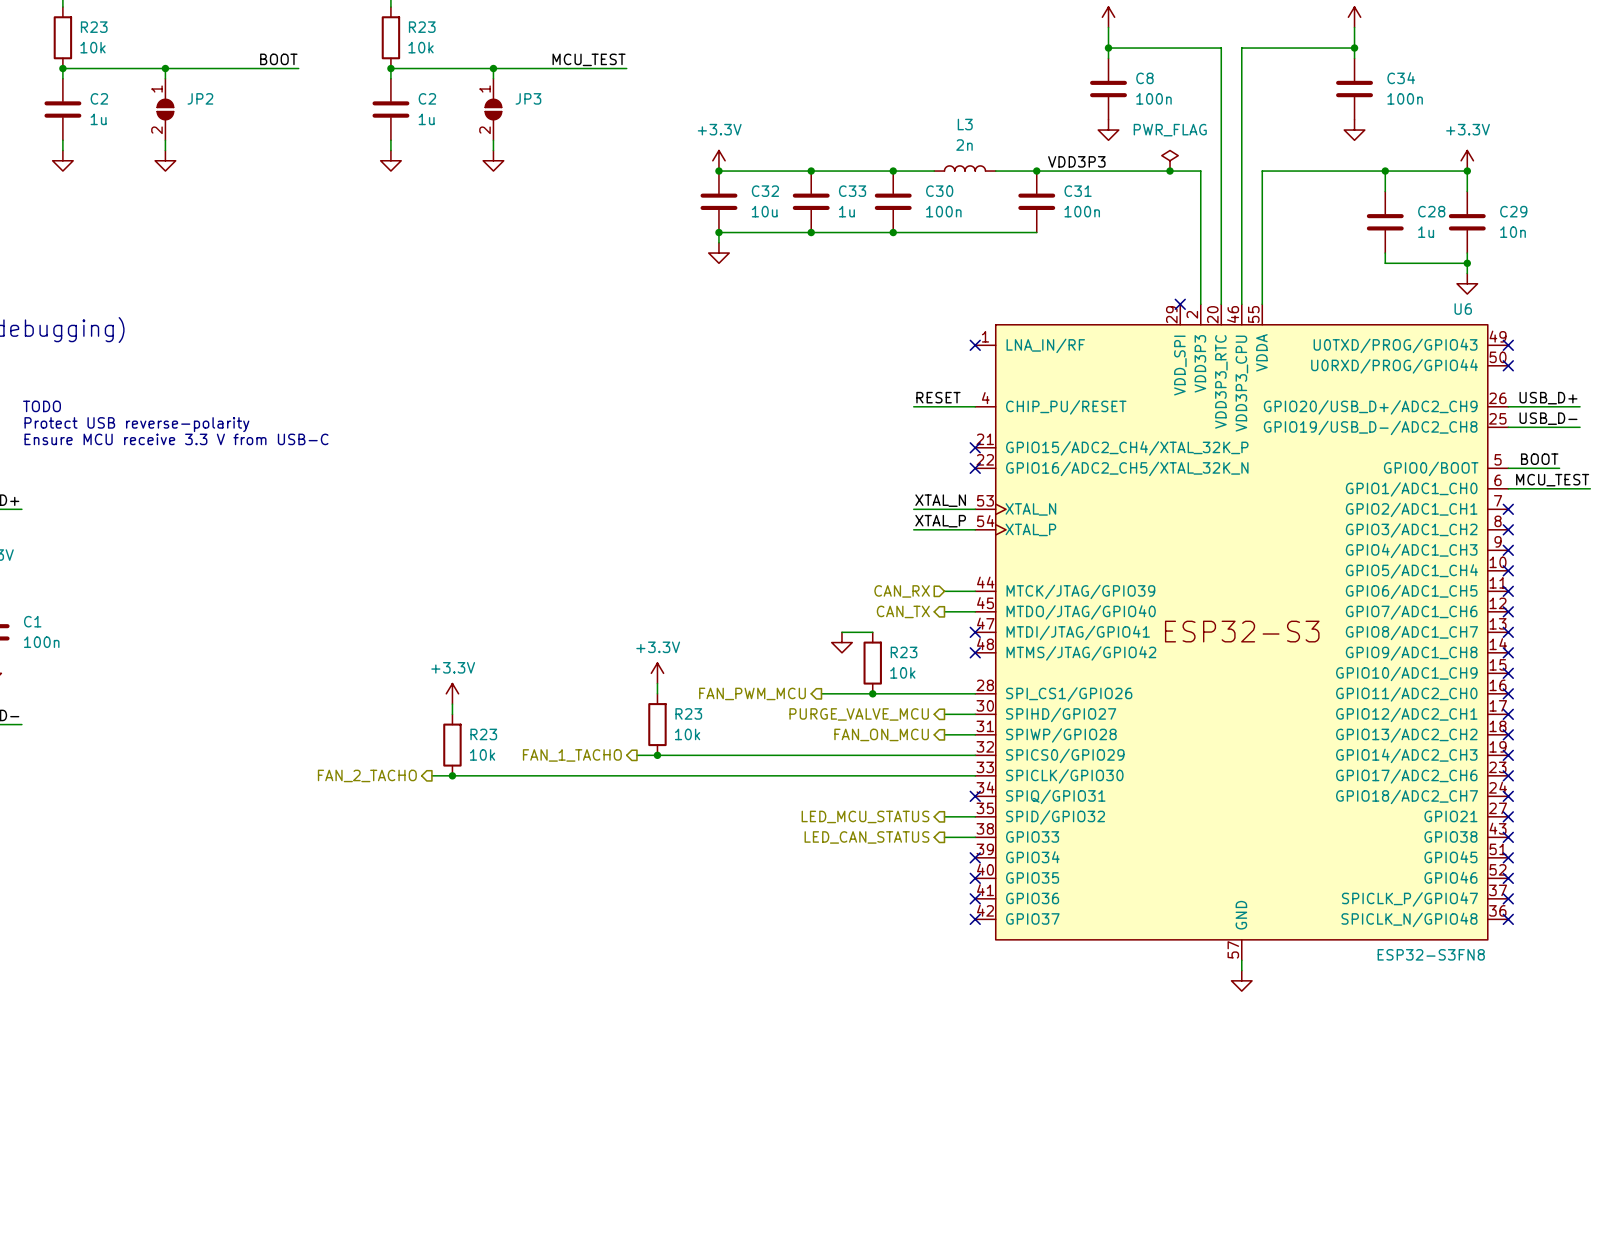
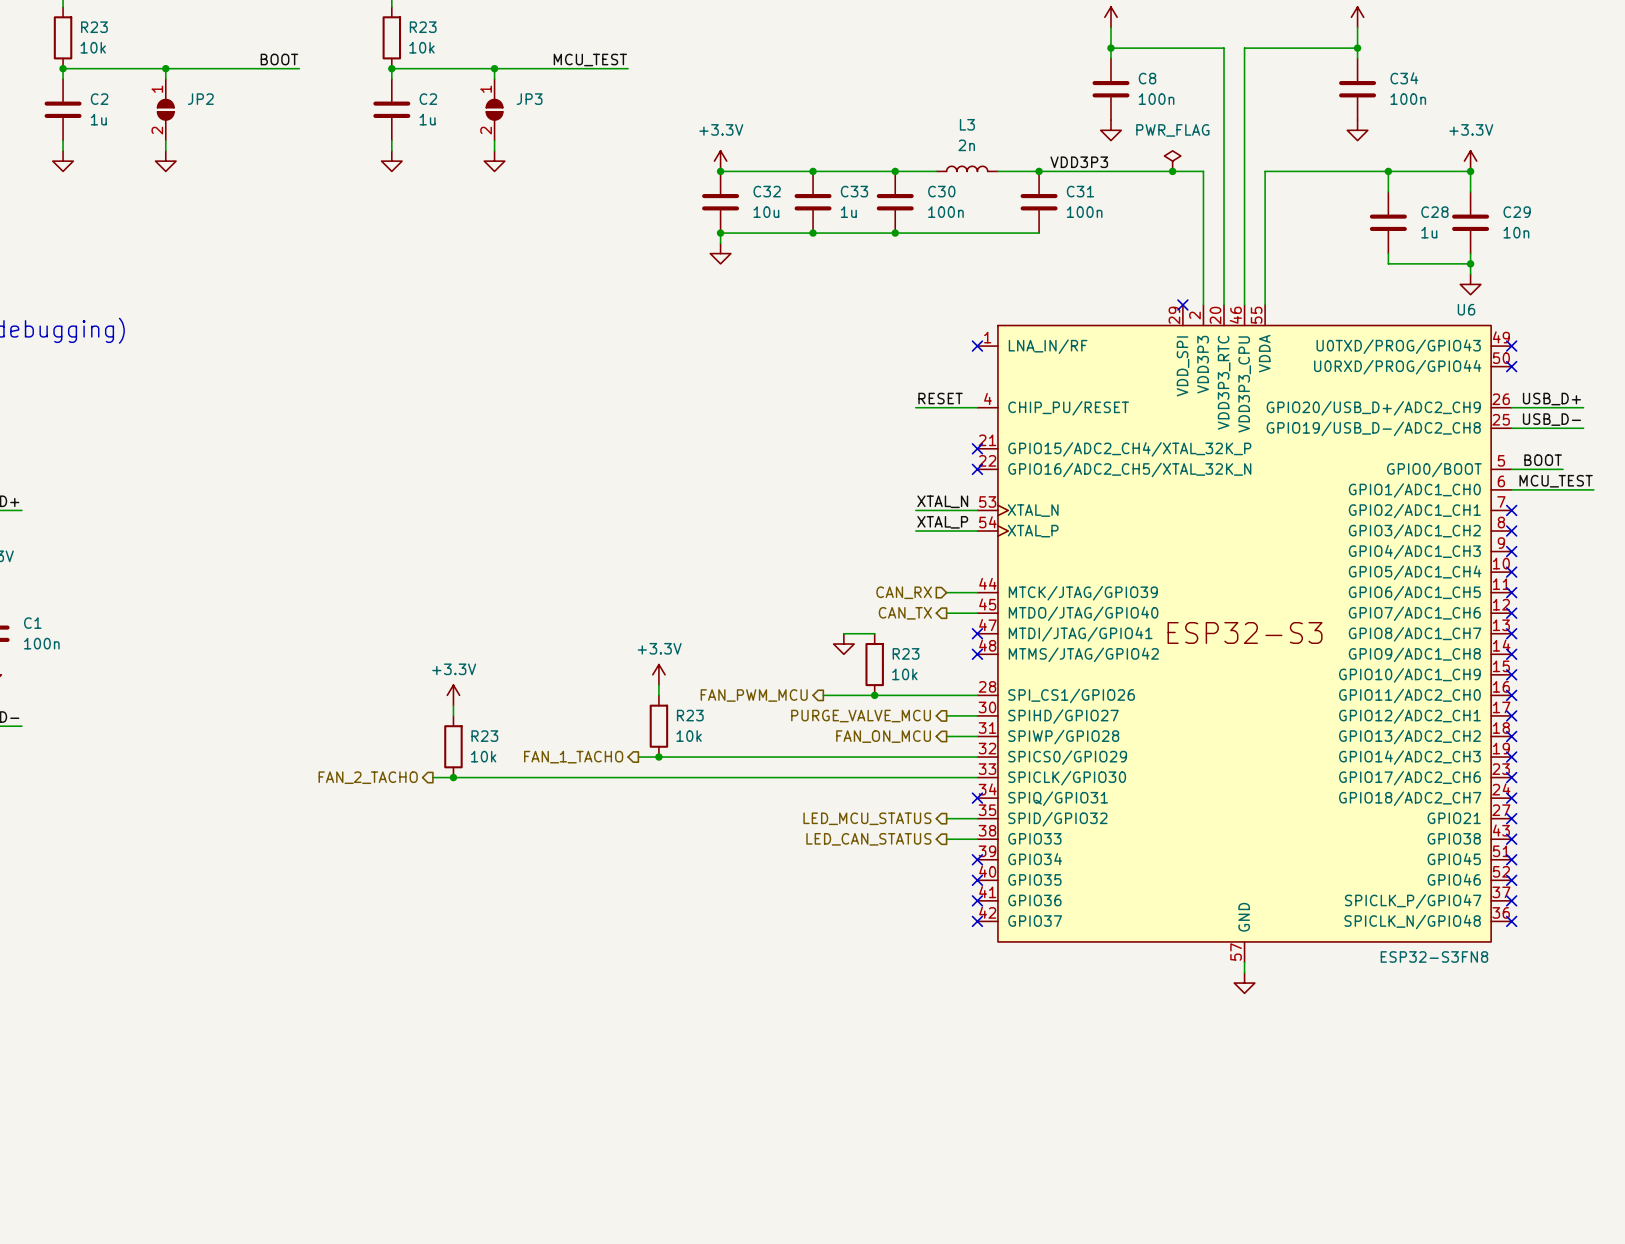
text: TODO (41, 406) -> none
text: Protect USB reverse-polarity (136, 424) -> none
text: Ensure MCU receive 3.3 V from USB-C (176, 439) -> none

